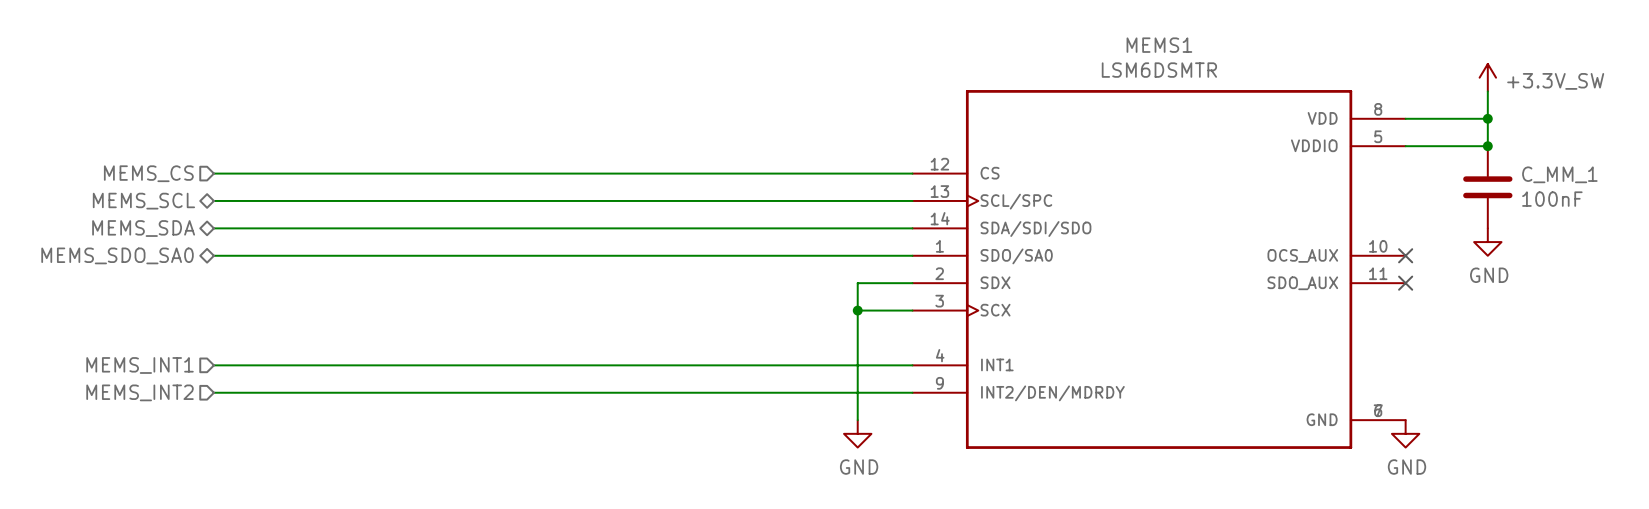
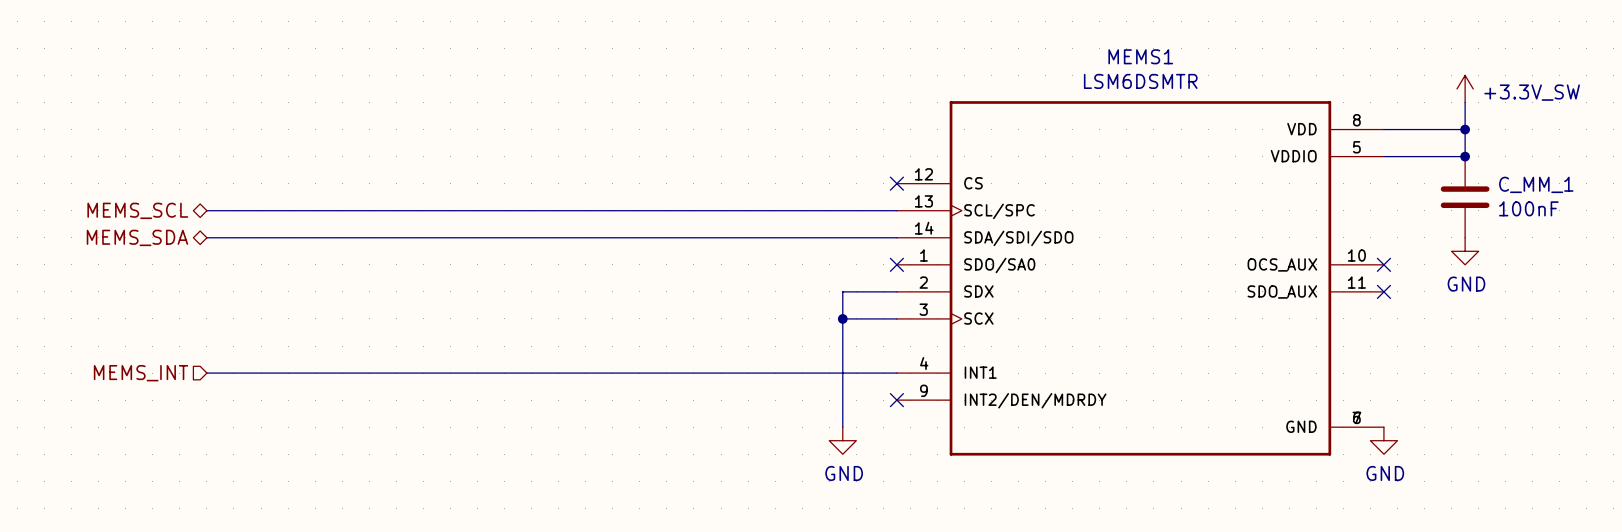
hierarchical label: MEMS_CS (148, 173) -> none
wire: (213, 173) (912, 173) -> none
no-connect mark: none -> (896, 183)
hierarchical label: MEMS_SDO_SA0 (117, 255) -> none
wire: (213, 255) (912, 255) -> none
no-connect mark: none -> (896, 264)
hierarchical label: MEMS_INT1 (140, 365) -> MEMS_INT (141, 373)
hierarchical label: MEMS_INT2 (140, 392) -> none
wire: (213, 392) (912, 392) -> none
no-connect mark: none -> (896, 400)

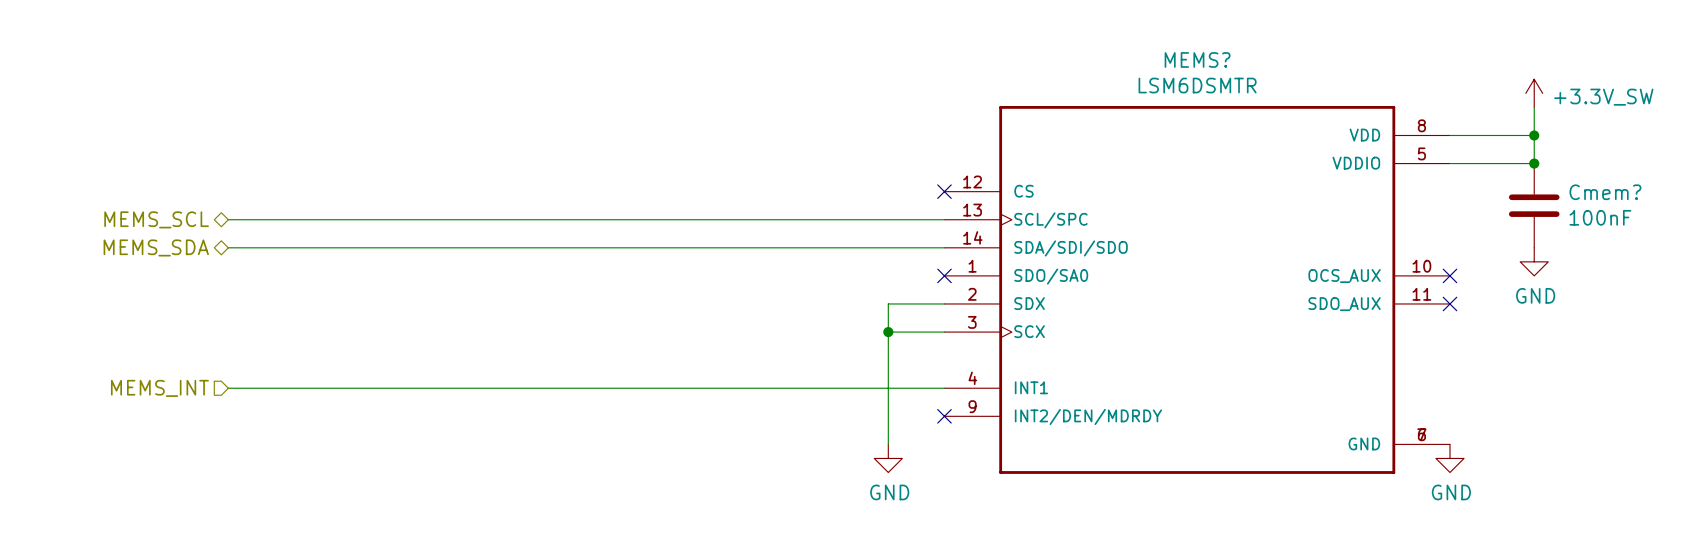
MEMS1 name: MEMS1 (1140, 56) -> MEMS? (1197, 59)
C_MM_1 name: C_MM_1 (1536, 184) -> Cmem? (1605, 192)

